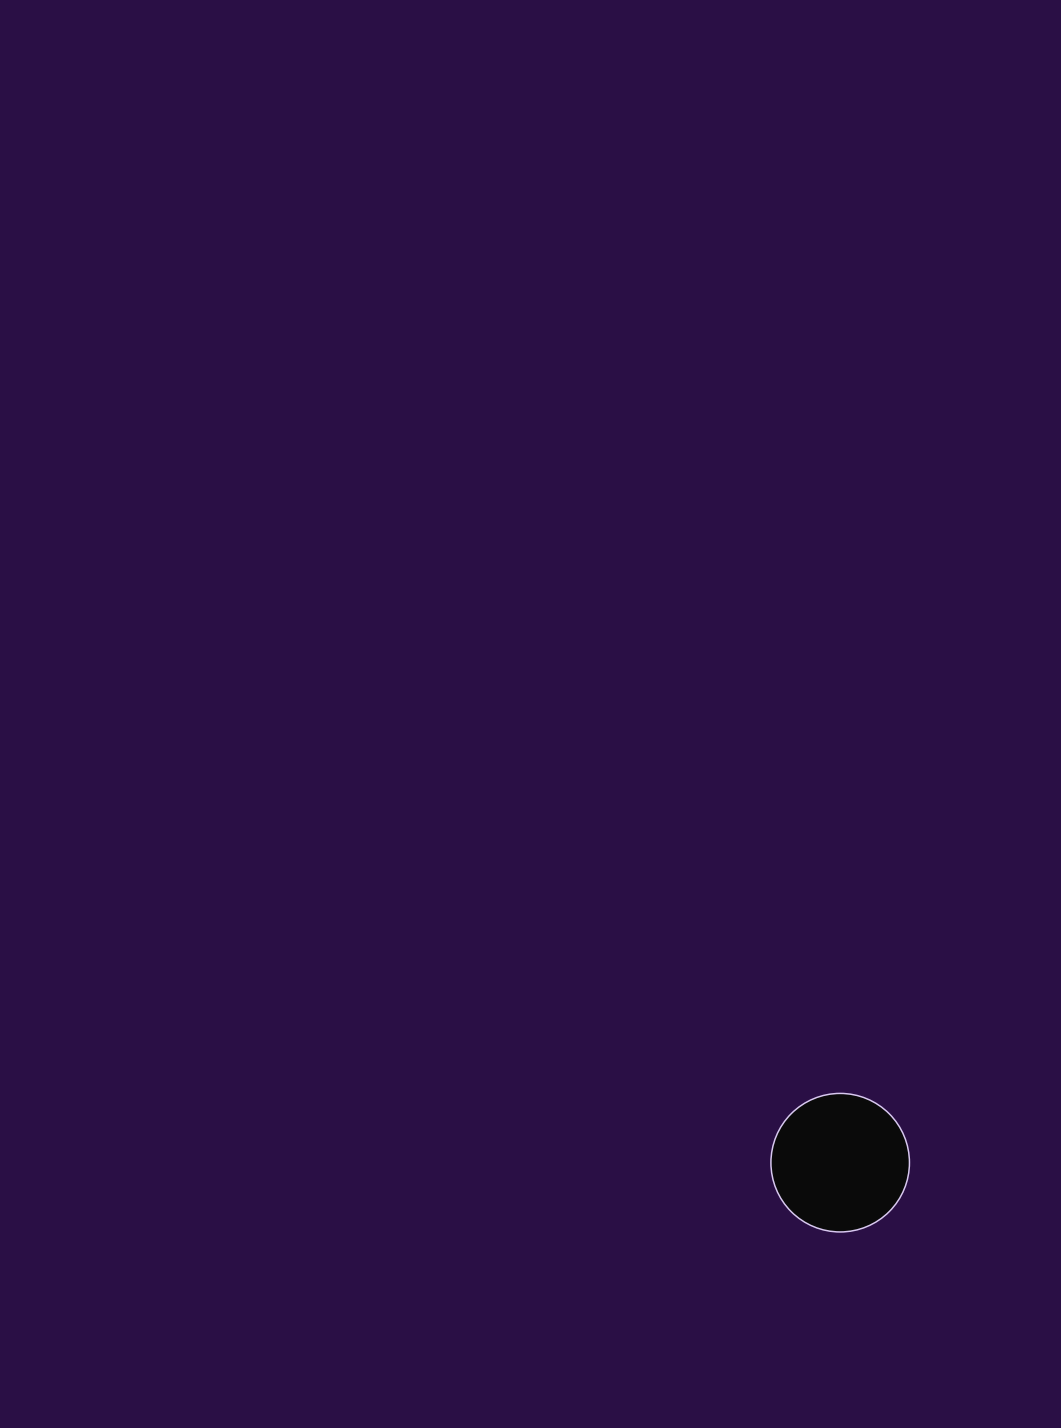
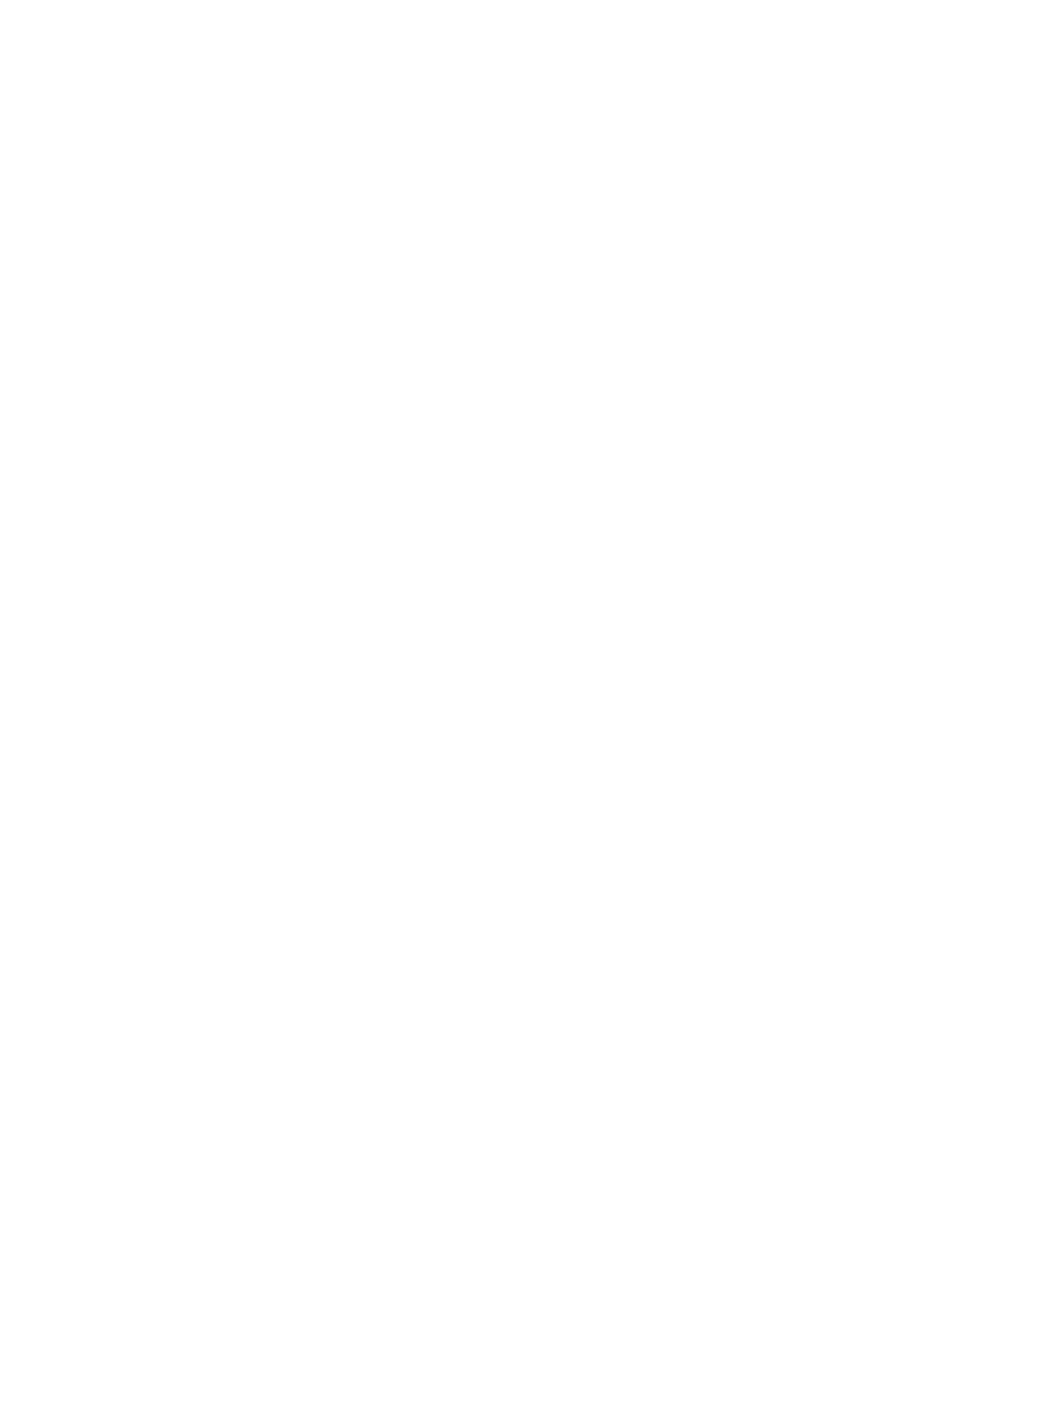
part: (840, 1162) -> none

